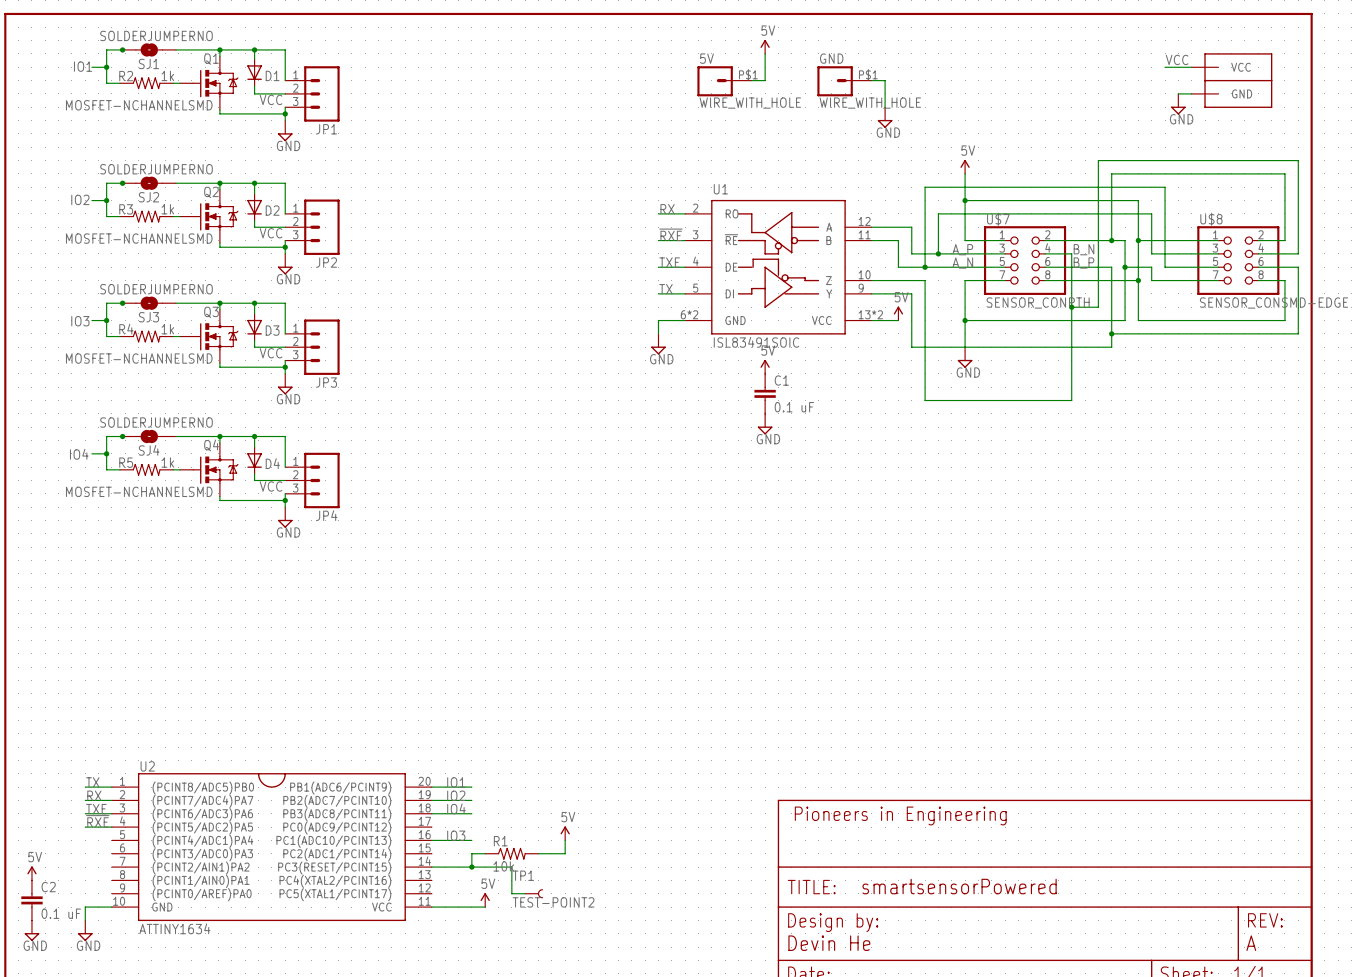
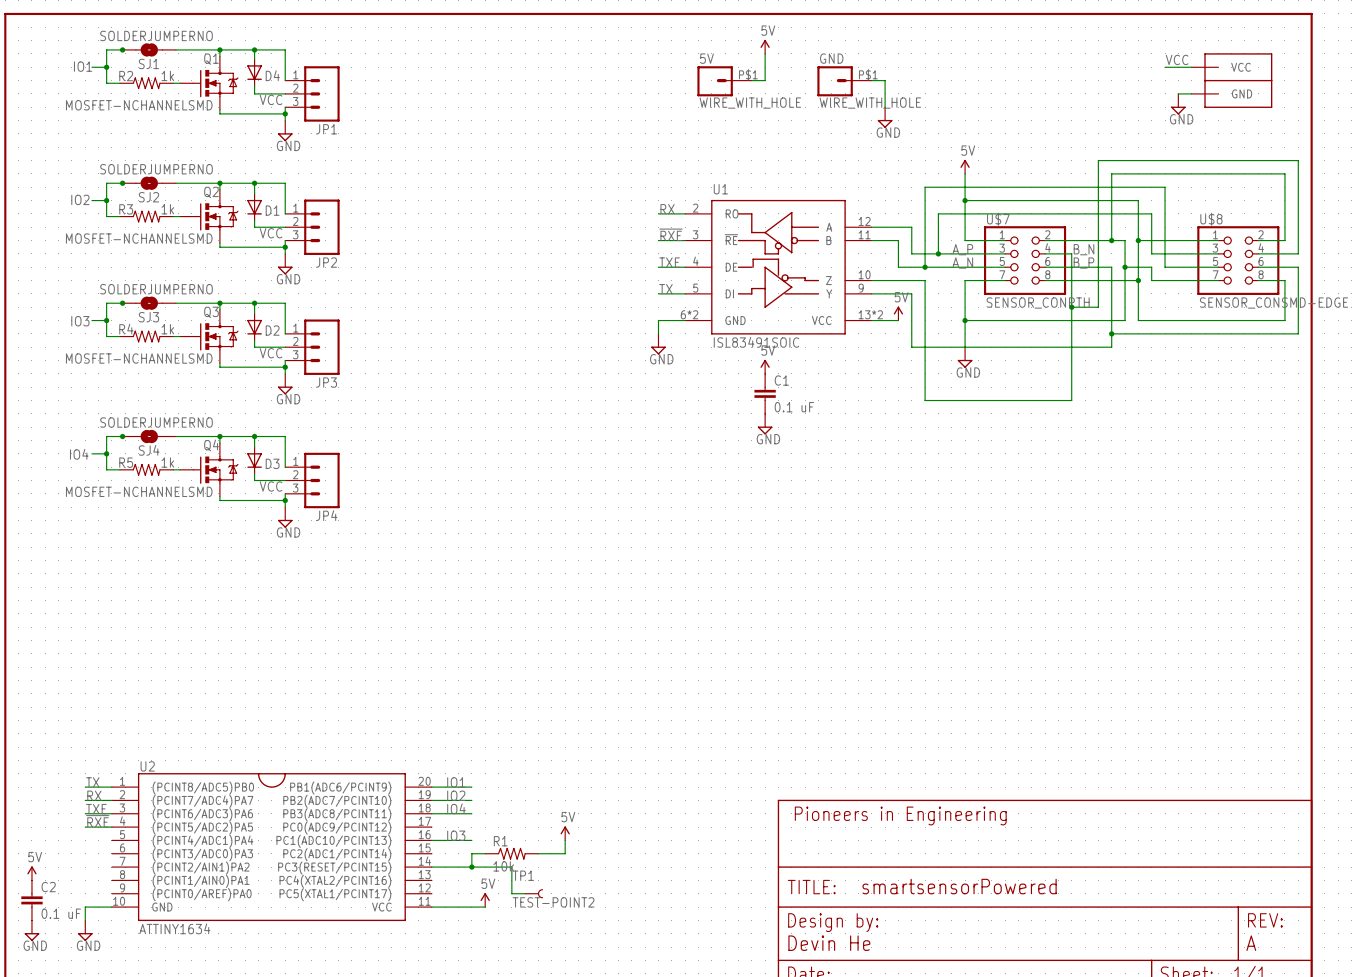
D1 name: D1 (272, 75) -> D4 (272, 75)
D2 name: D2 (272, 210) -> D1 (272, 210)
D3 name: D3 (272, 330) -> D2 (272, 330)
D4 name: D4 (272, 463) -> D3 (272, 463)

